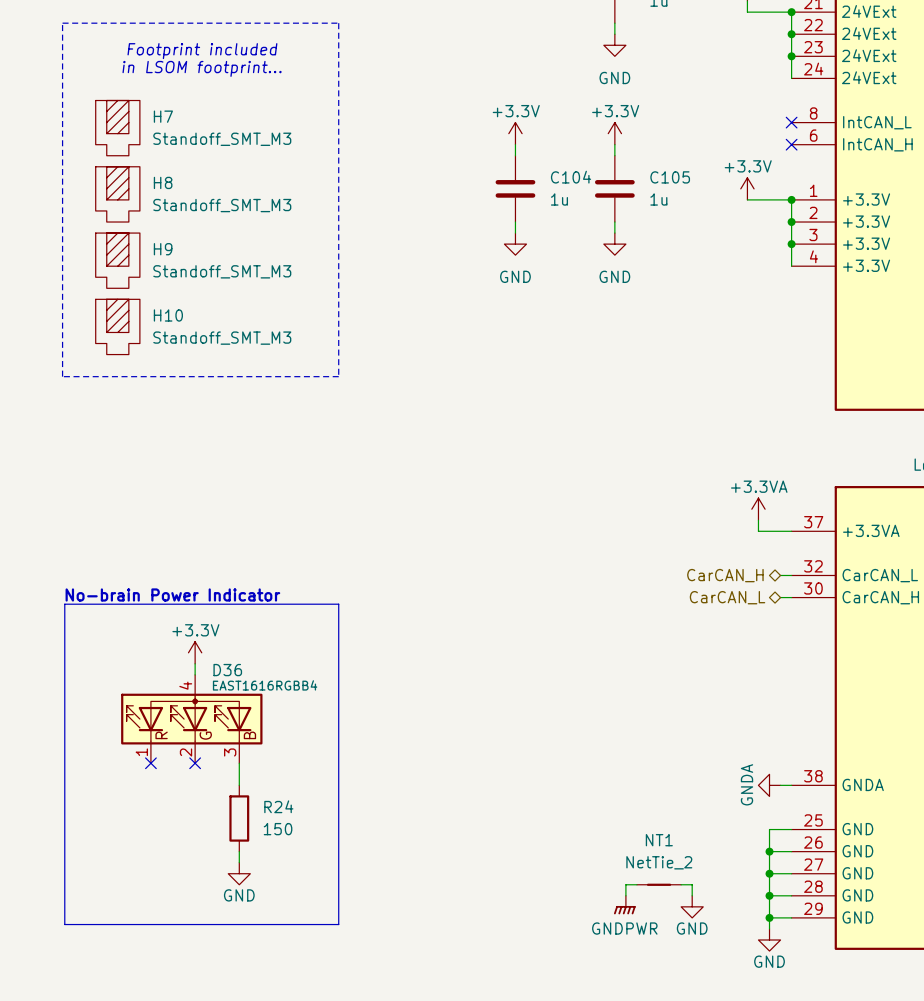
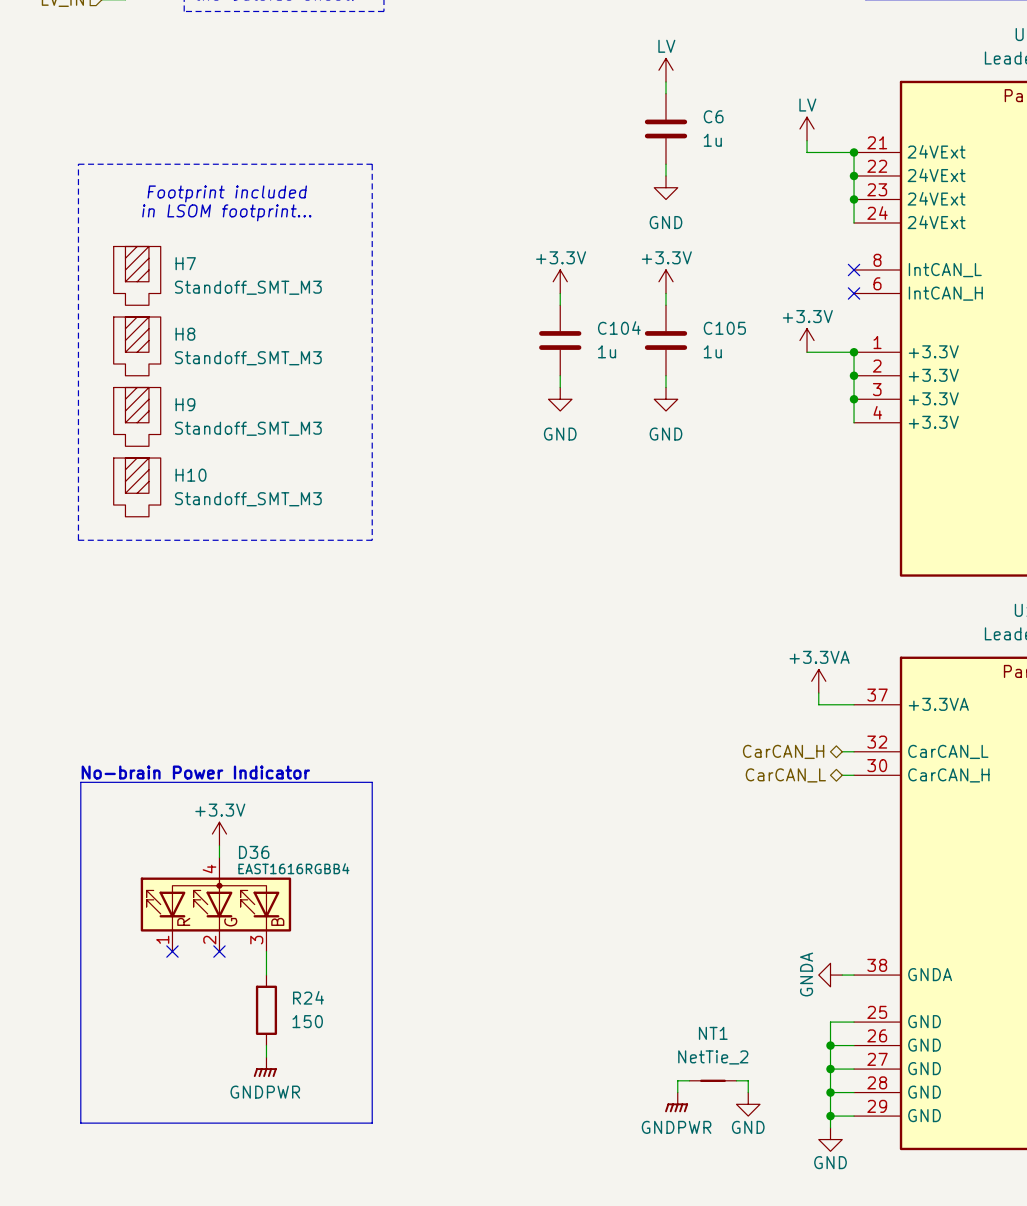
power symbol: GND (239, 873) -> GNDPWR (265, 1067)

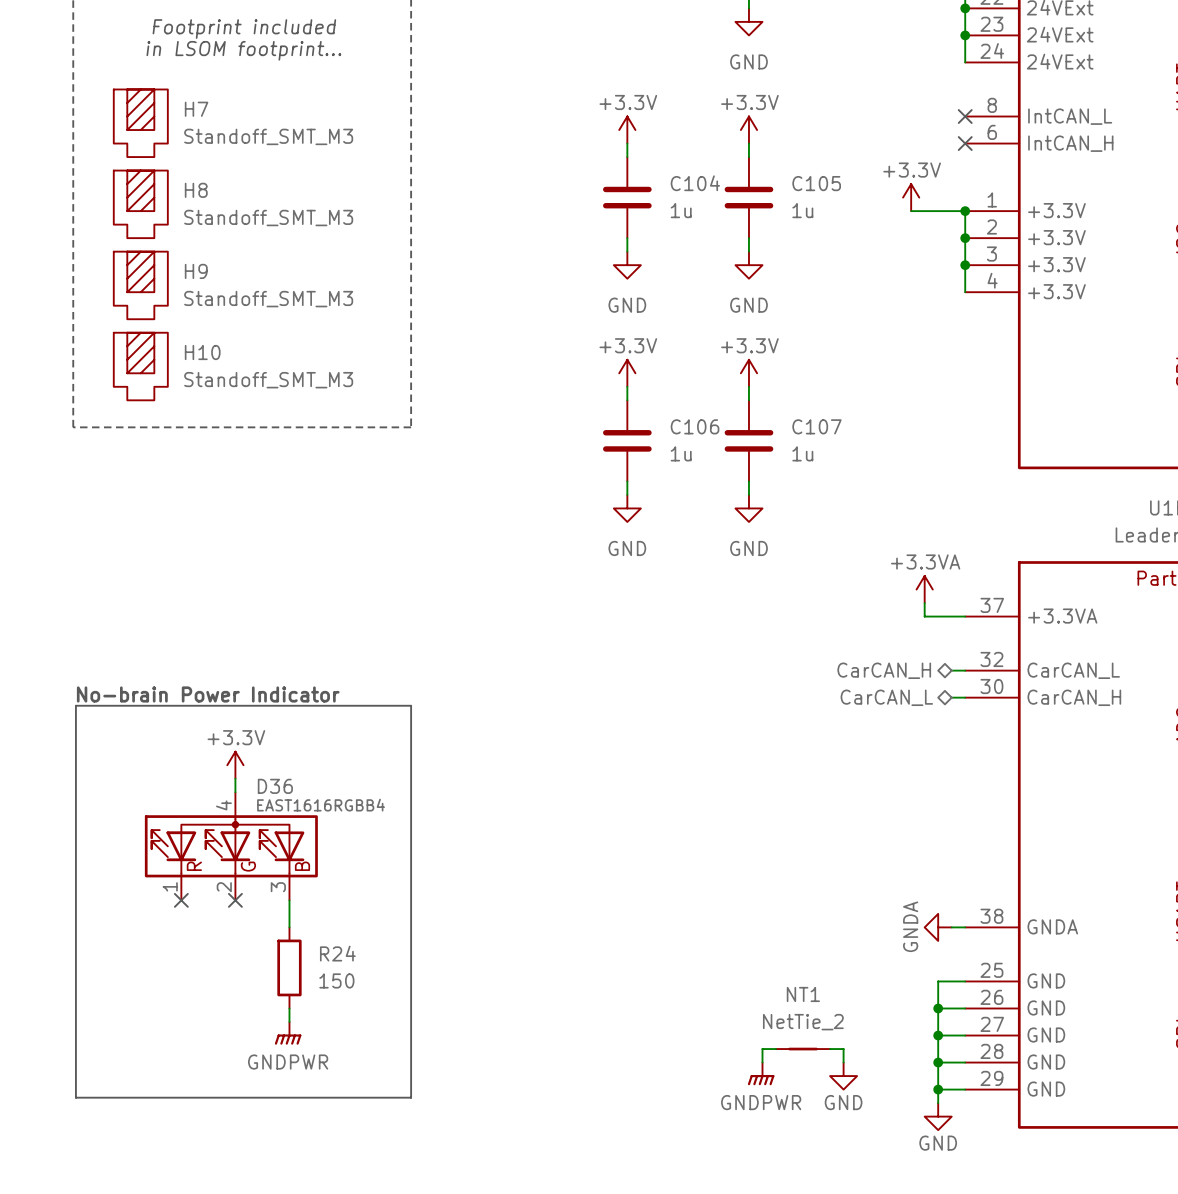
power symbol: none -> +3.3V (627, 373)
power symbol: none -> +3.3V (748, 373)
wire: none -> (627, 386) (627, 400)
wire: none -> (748, 386) (748, 400)
C106: none -> 1u (627, 440)
C107: none -> 1u (748, 440)
wire: none -> (627, 481) (627, 494)
wire: none -> (748, 481) (748, 494)
power symbol: none -> GND (627, 508)
power symbol: none -> GND (748, 508)

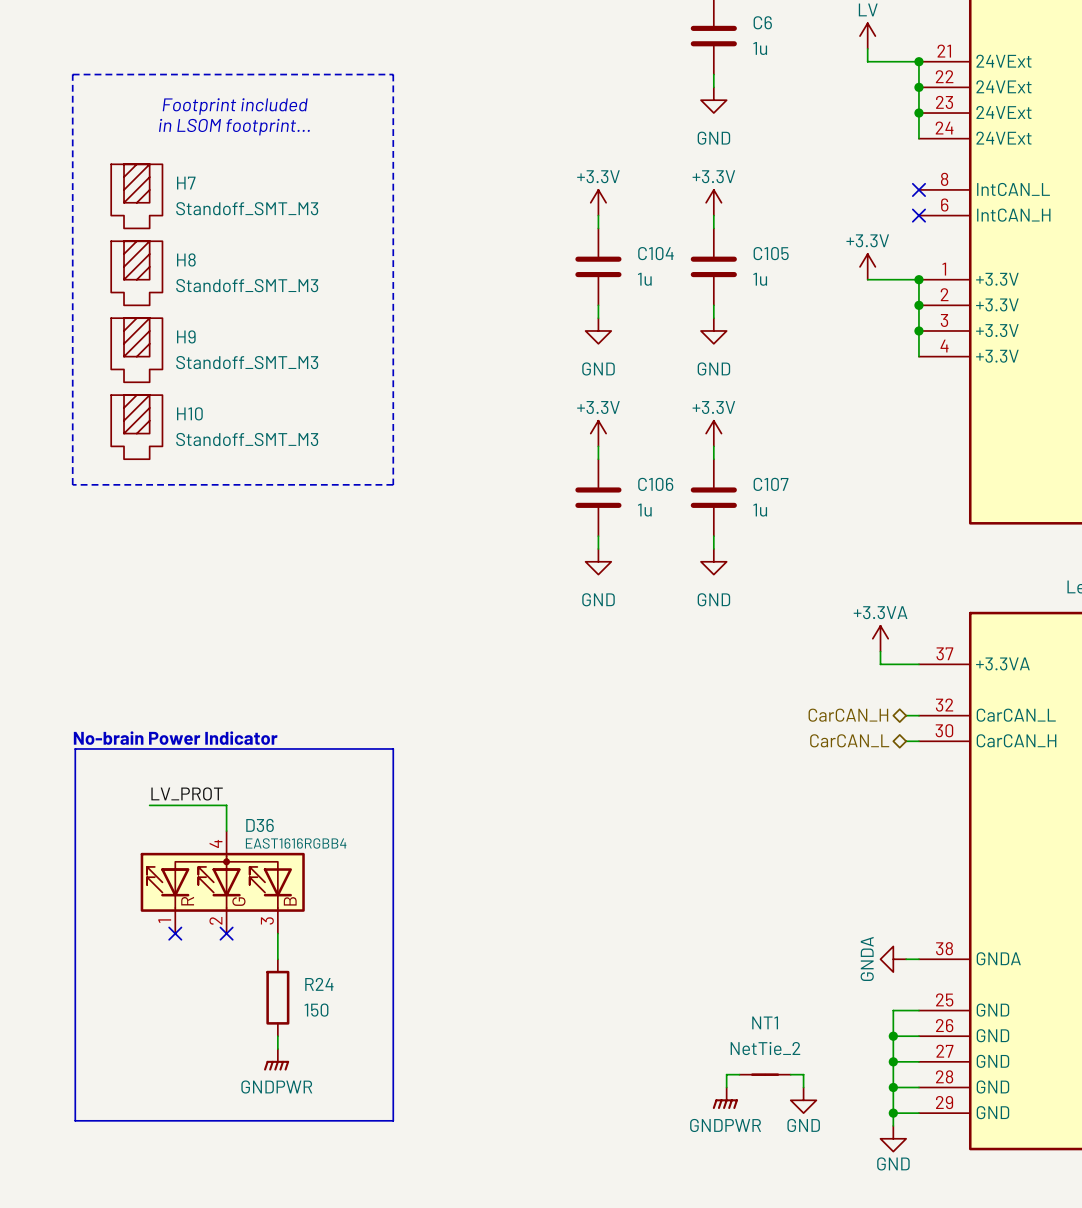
label: none -> LV_PROT (187, 793)
wire: none -> (149, 805) (226, 805) (226, 818)
power symbol: +3.3V (235, 765) -> none

